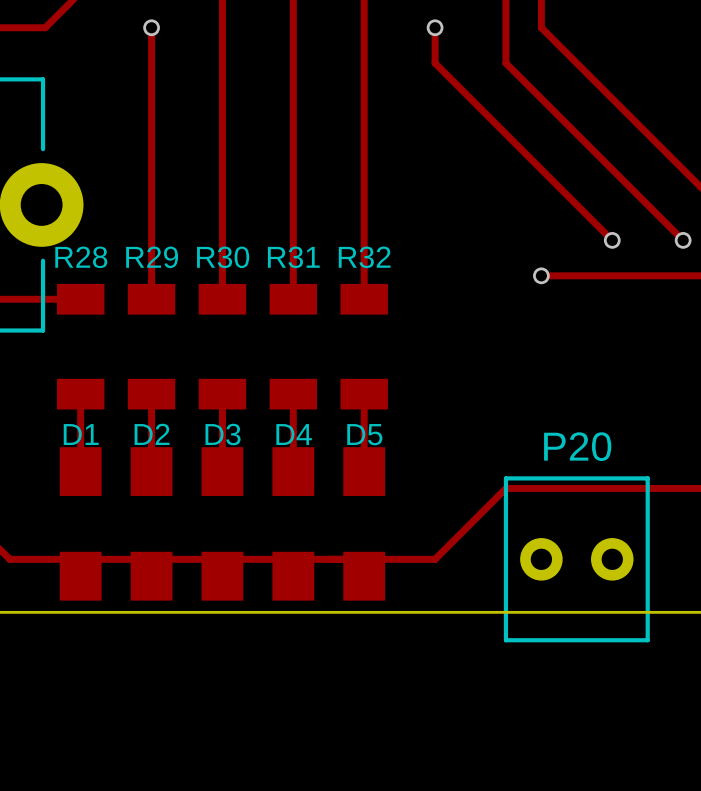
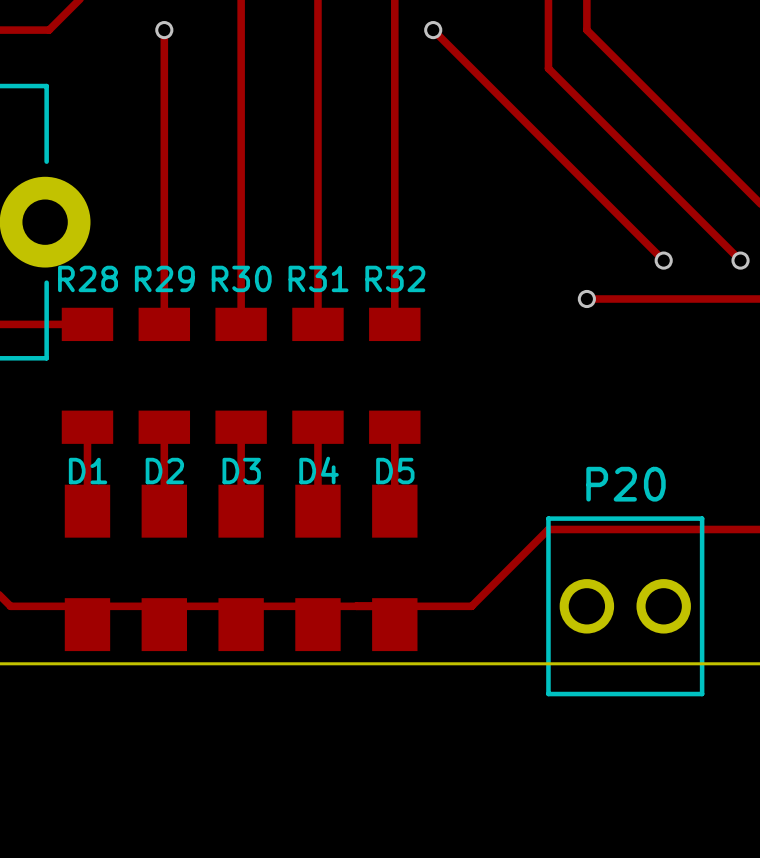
track: (435, 27) (435, 63) -> (433, 30) (471, 68)
via position: (435, 27) -> (433, 30)
P20 footprint: [503, 476, 650, 643] -> [546, 516, 705, 697]

